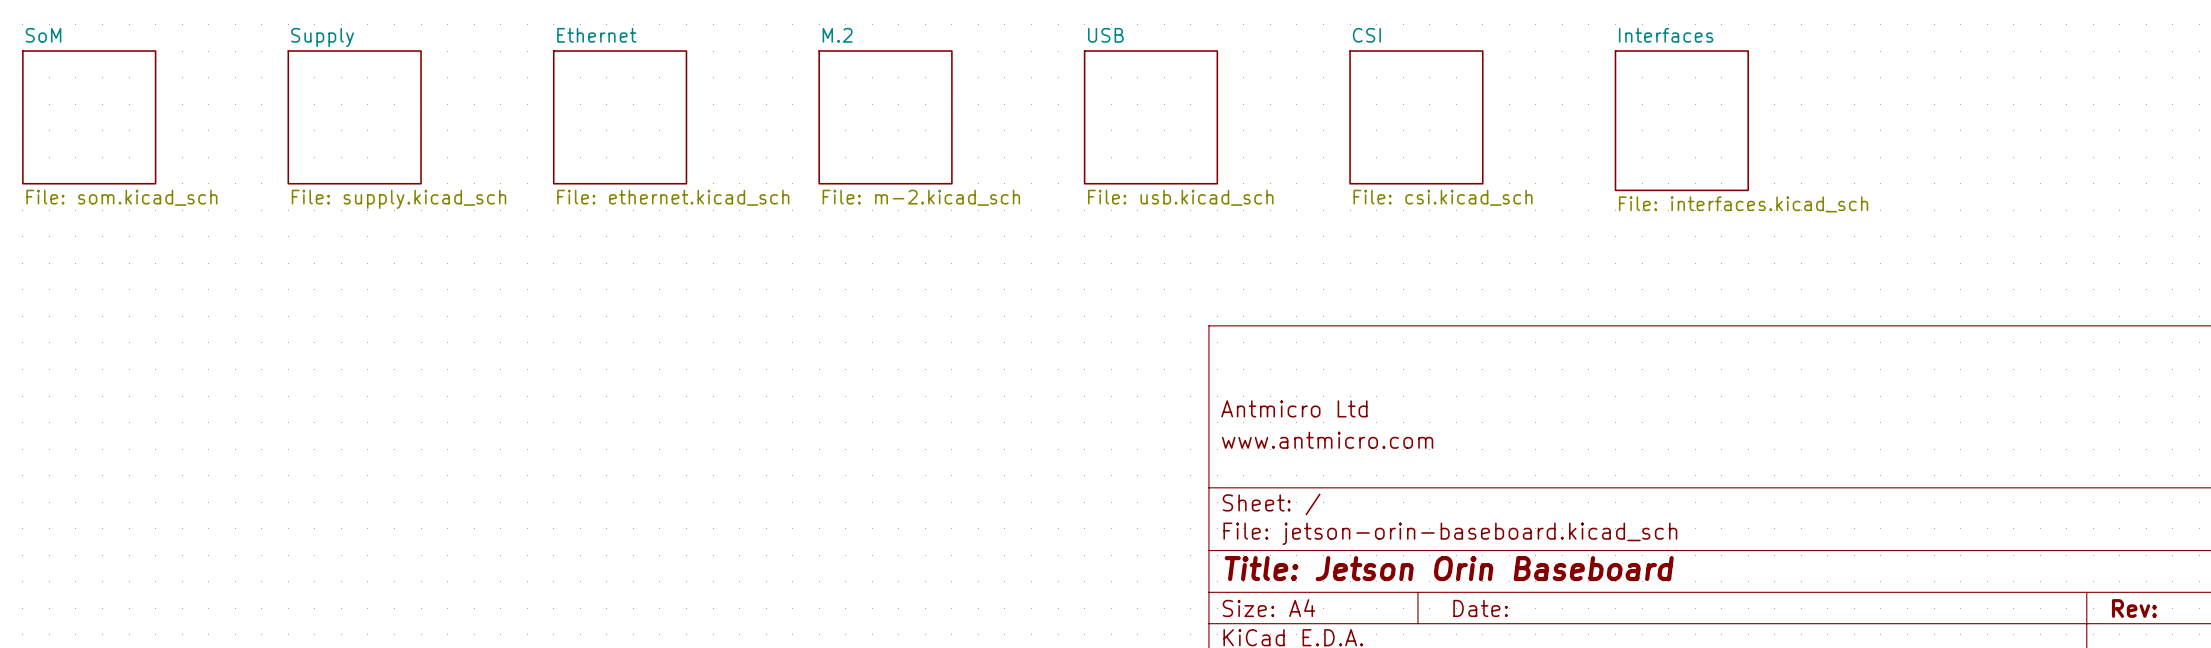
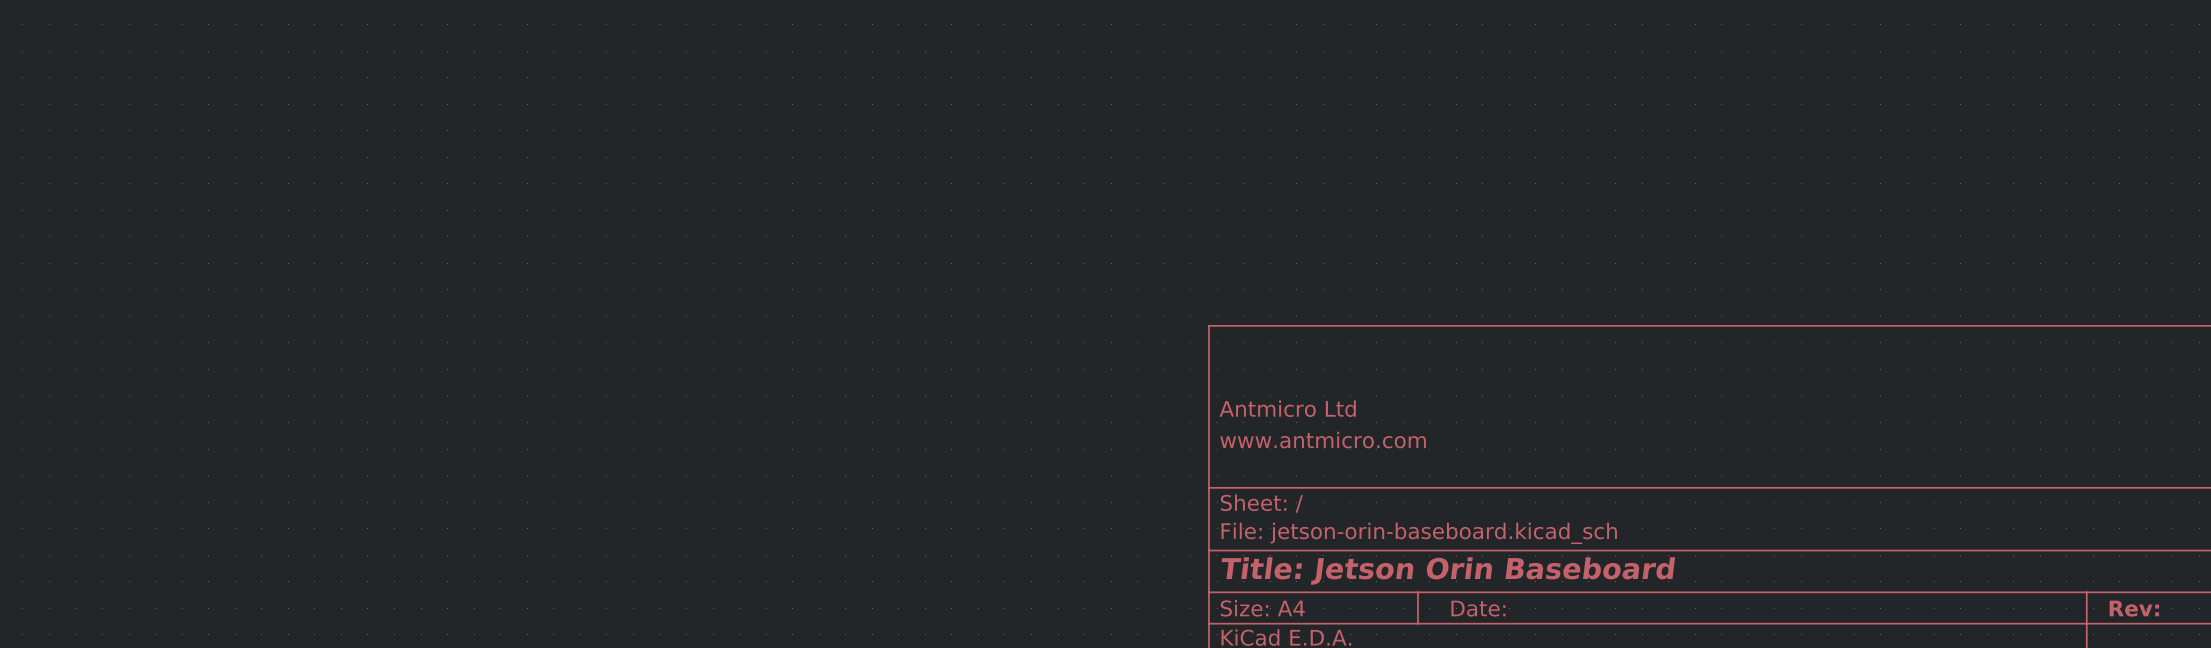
sheet SoM: File: som.kicad_sch (89, 117) -> none
sheet Supply: File: supply.kicad_sch (354, 117) -> none
sheet Ethernet: File: ethernet.kicad_sch (620, 117) -> none
sheet M.2: File: m-2.kicad_sch (885, 117) -> none
sheet USB: File: usb.kicad_sch (1150, 117) -> none
sheet CSI: File: csi.kicad_sch (1416, 117) -> none
sheet Interfaces: File: interfaces.kicad_sch (1681, 120) -> none

